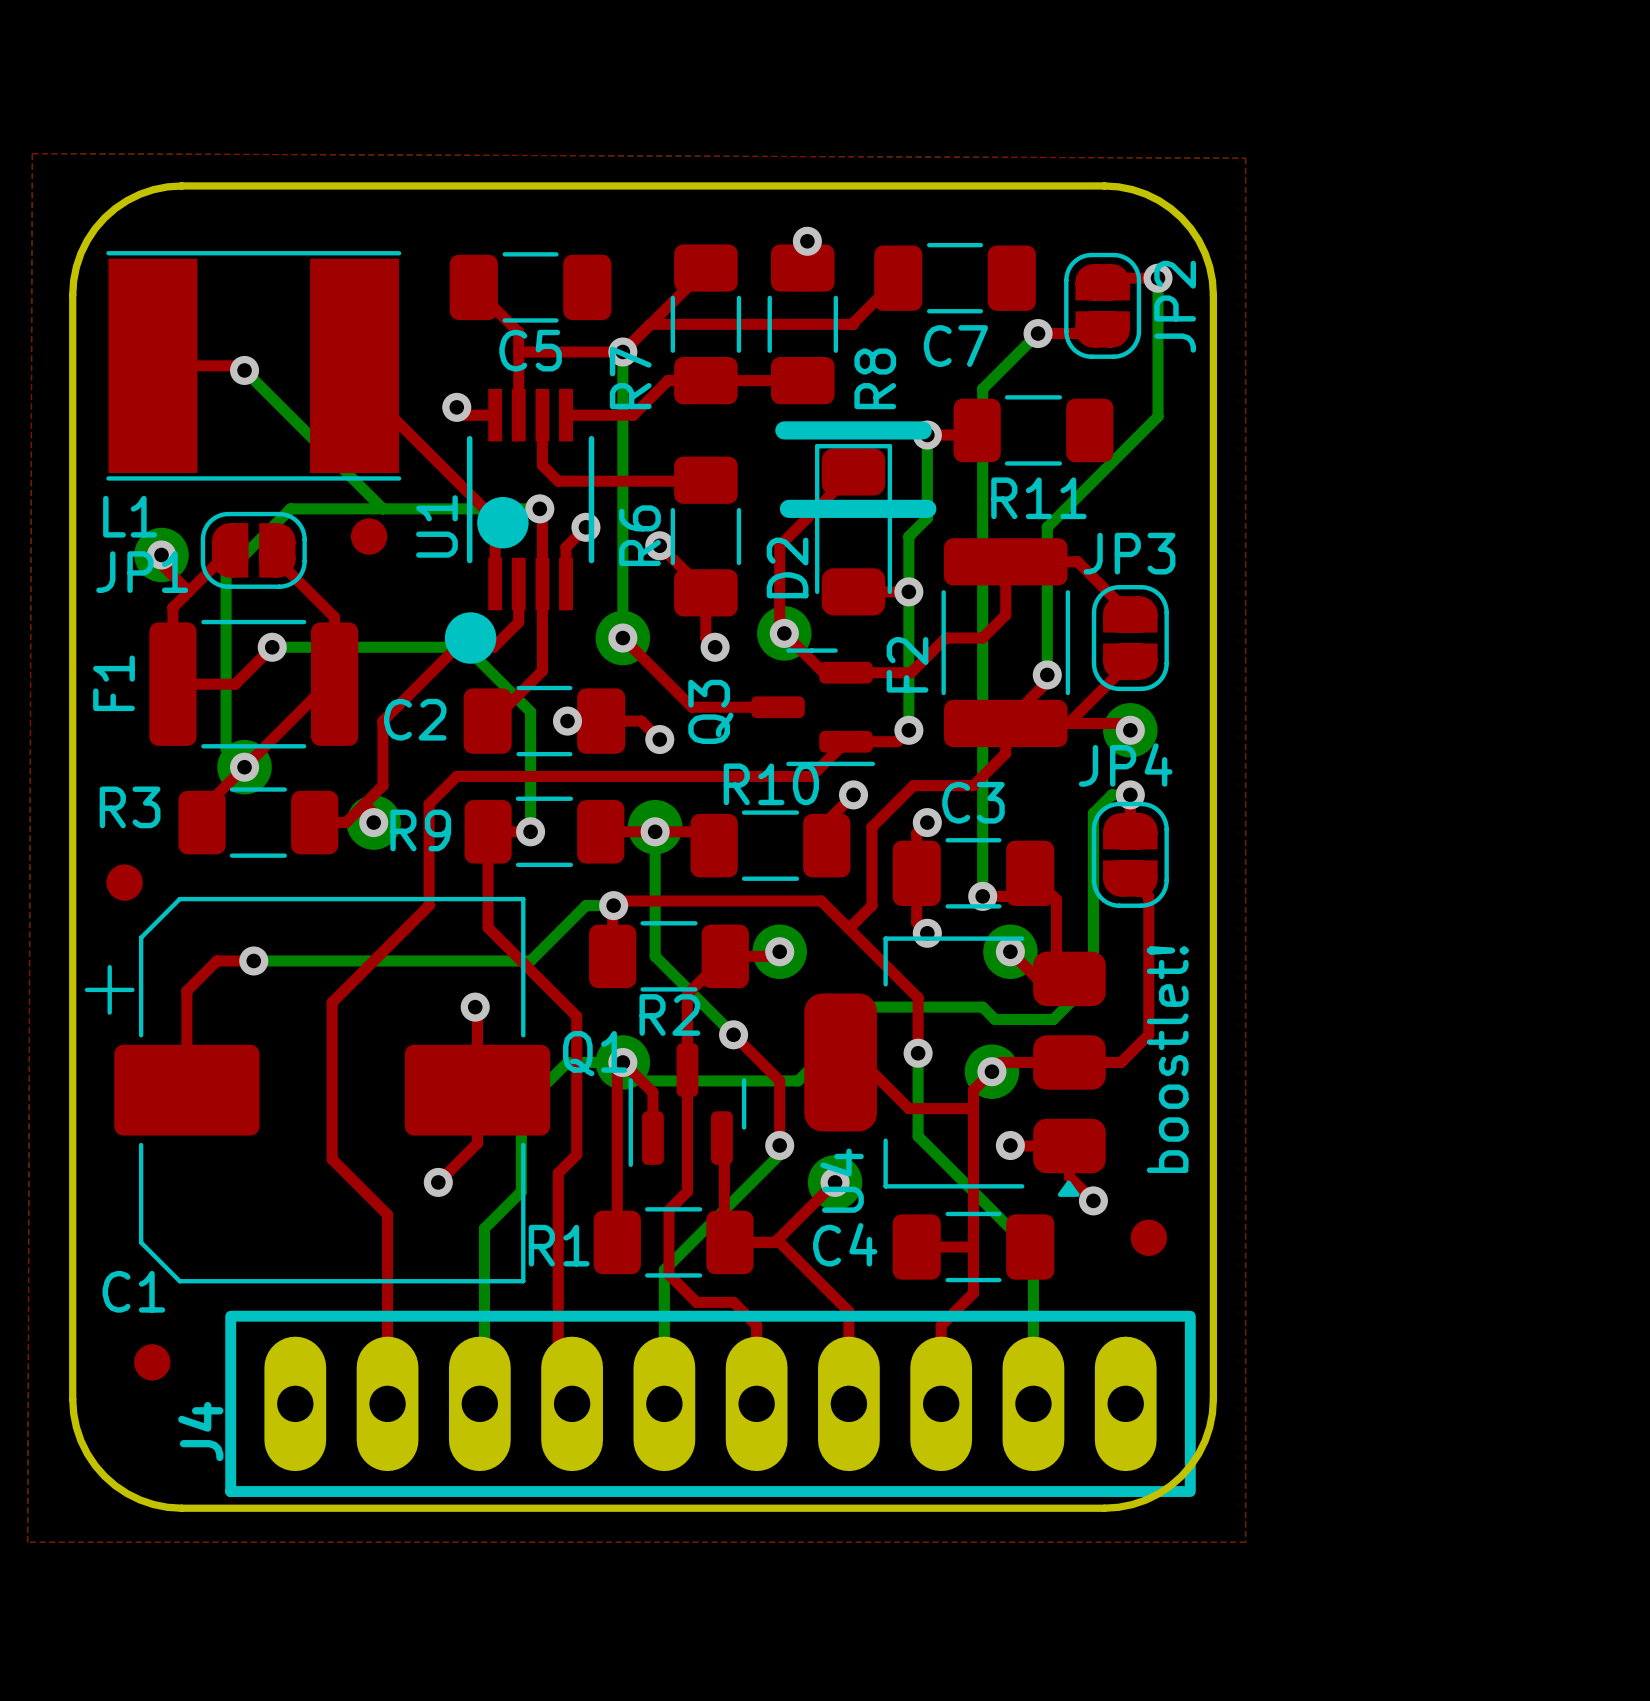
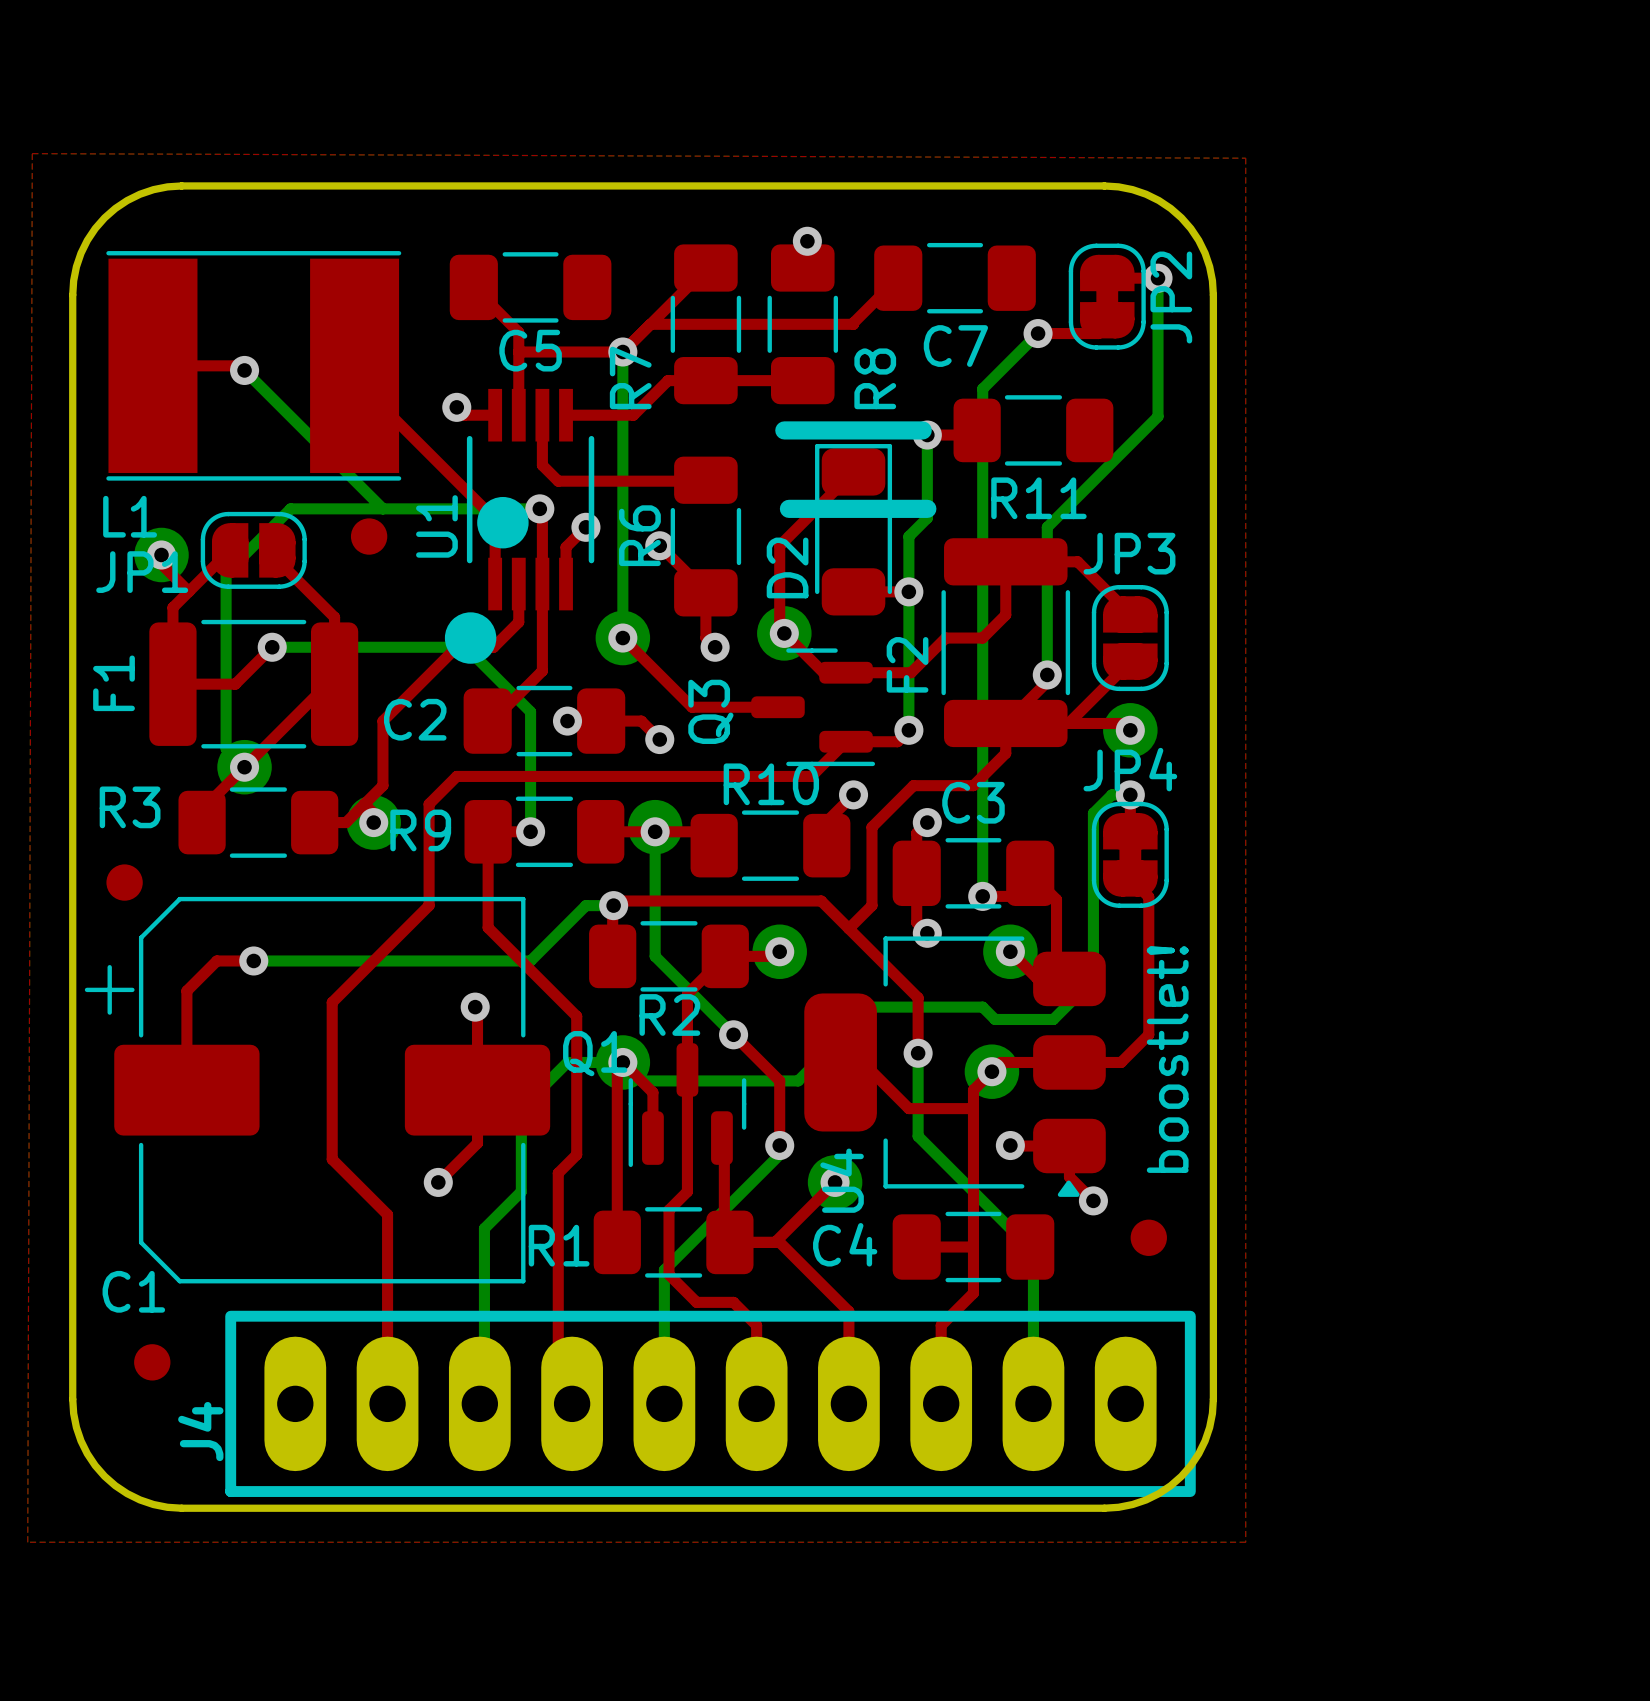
JP2 footprint: [1064, 252, 1142, 359] -> [1068, 243, 1146, 350]
JP4 footprint: [1091, 801, 1169, 908] -> [1091, 801, 1169, 908]

